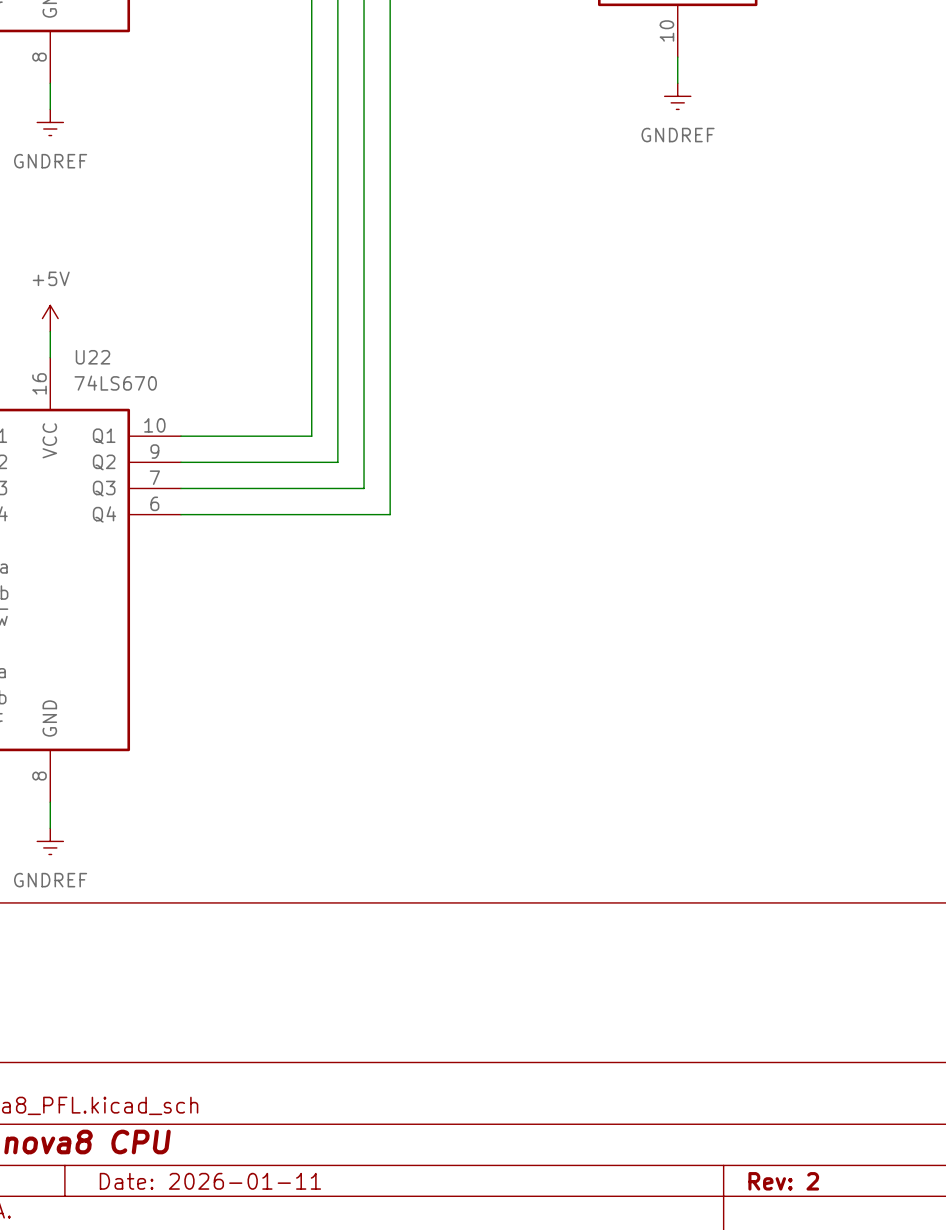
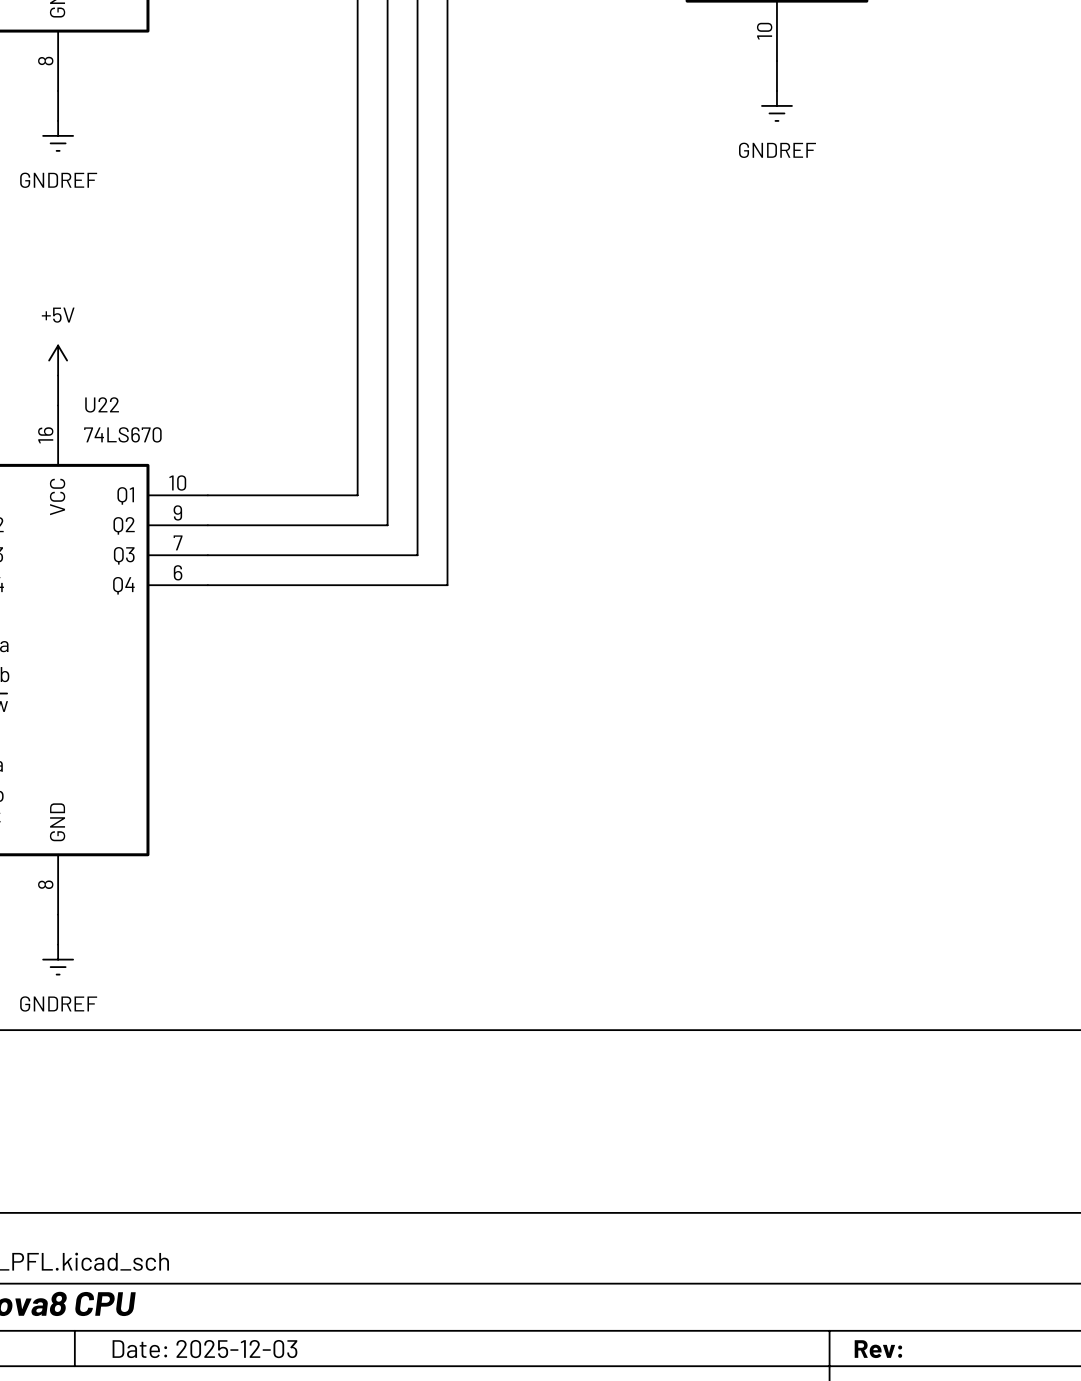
title block: Date: 2026-01-11 (210, 1181) -> Date: 2025-12-03 (204, 1349)
title block: Rev: 2 (783, 1181) -> Rev: (878, 1349)

